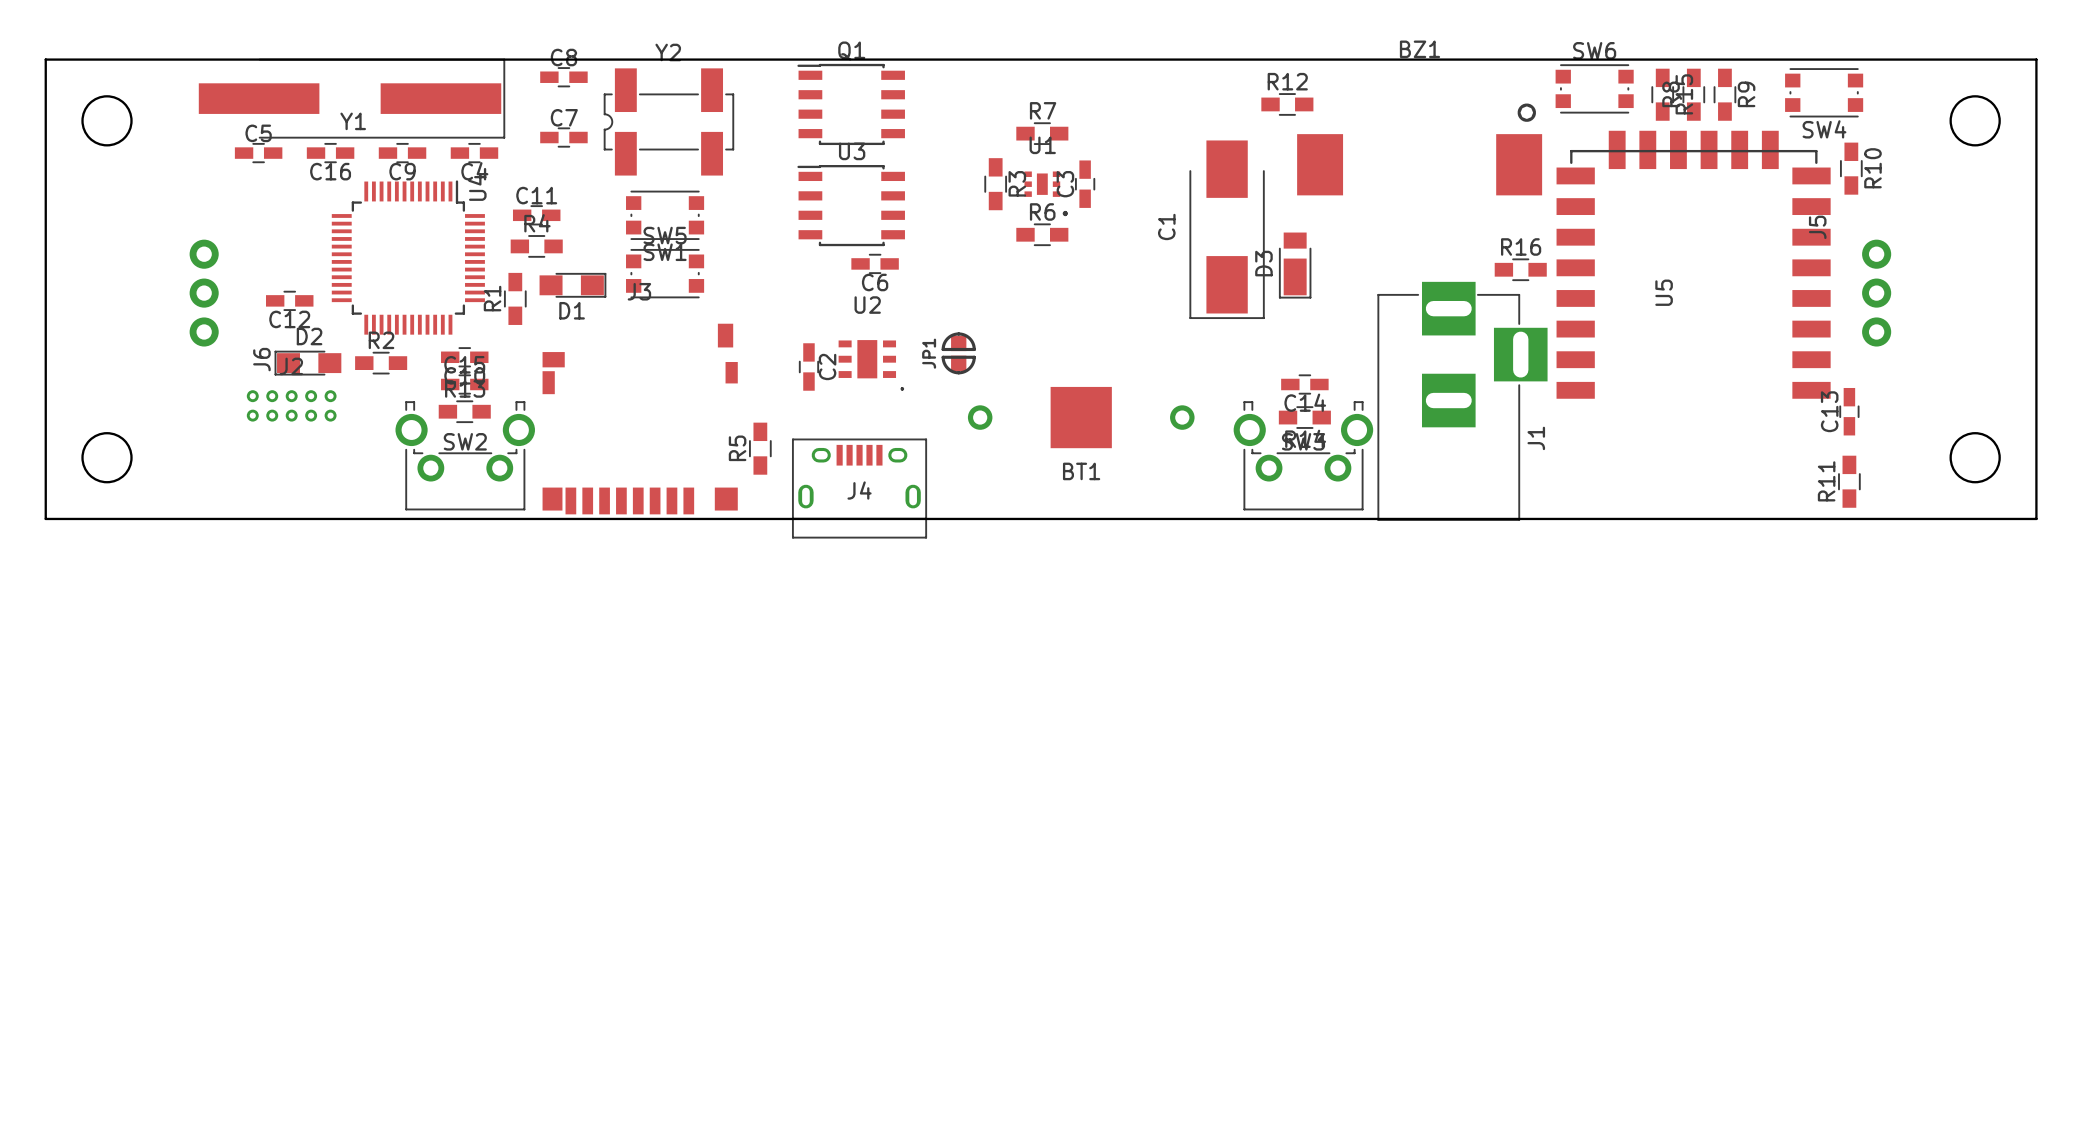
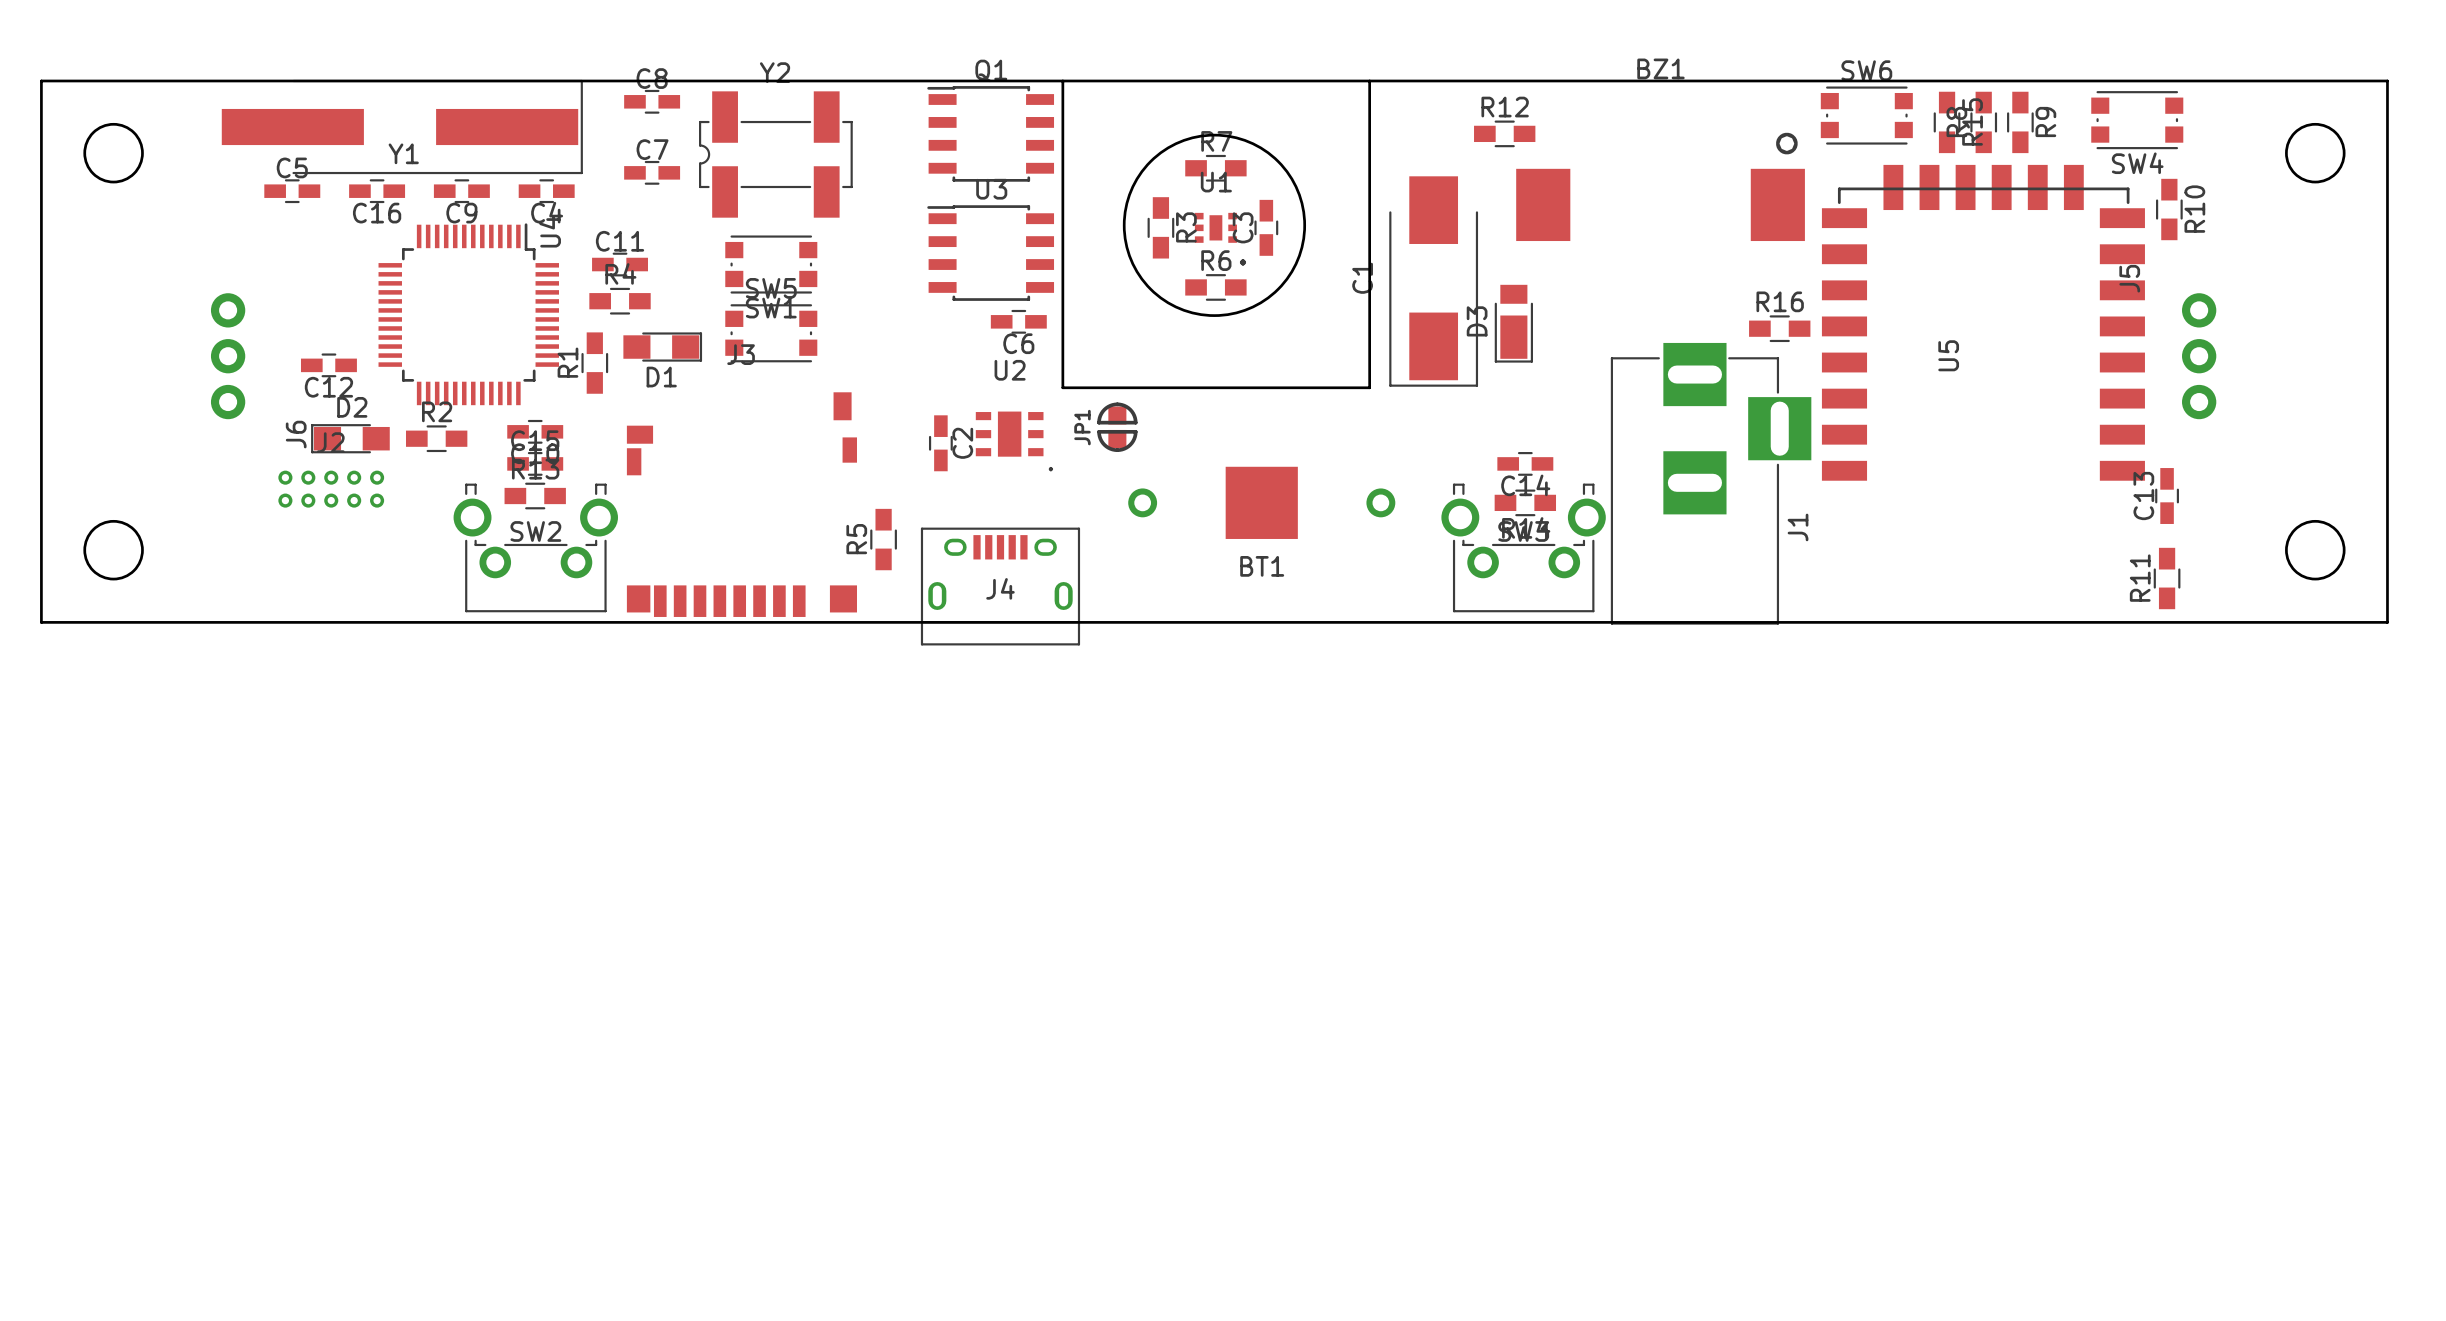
board edge: none -> (1062, 80) (1062, 387) (1369, 387) (1369, 80)
round board edge: none -> [1122, 133, 1307, 317]

